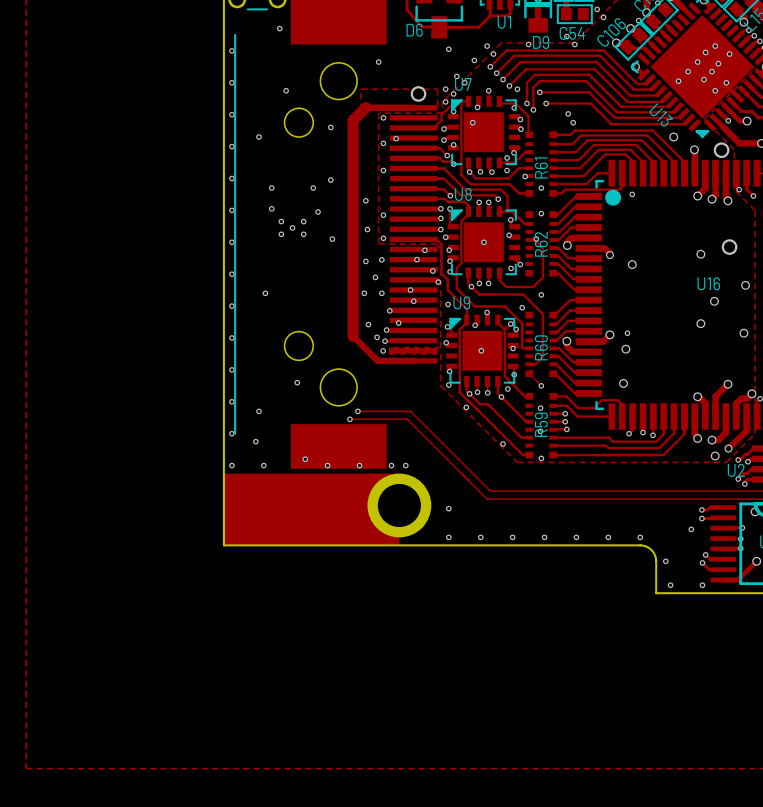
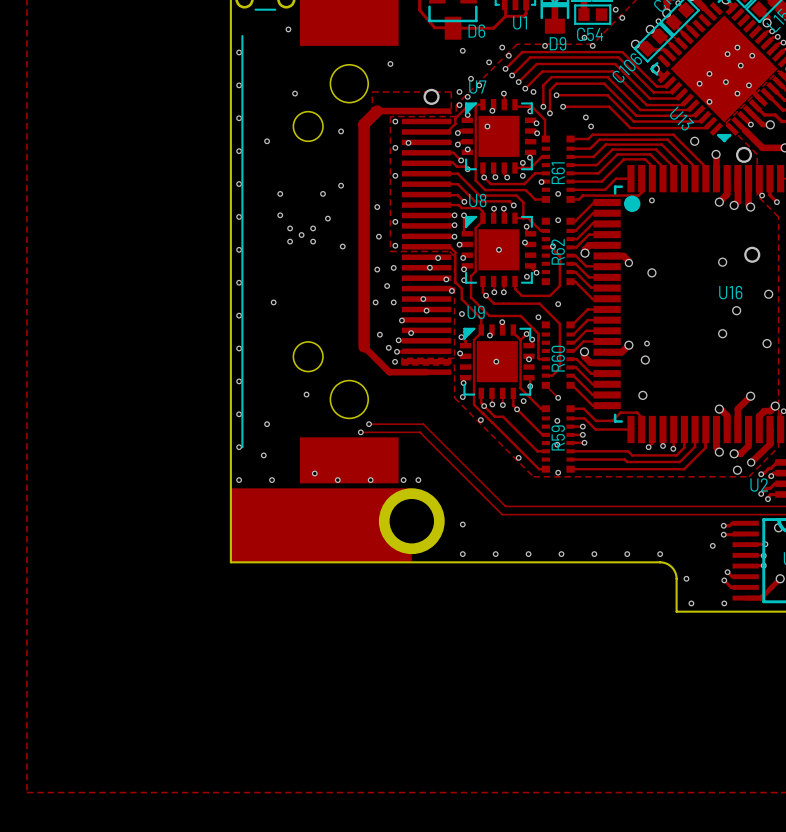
D6 name position: D6 (414, 30) -> D6 (476, 31)
C106 name position: C106 (611, 32) -> C106 (627, 68)
via: (697, 62) -> none
via: (712, 71) -> none
via: none -> (709, 101)

